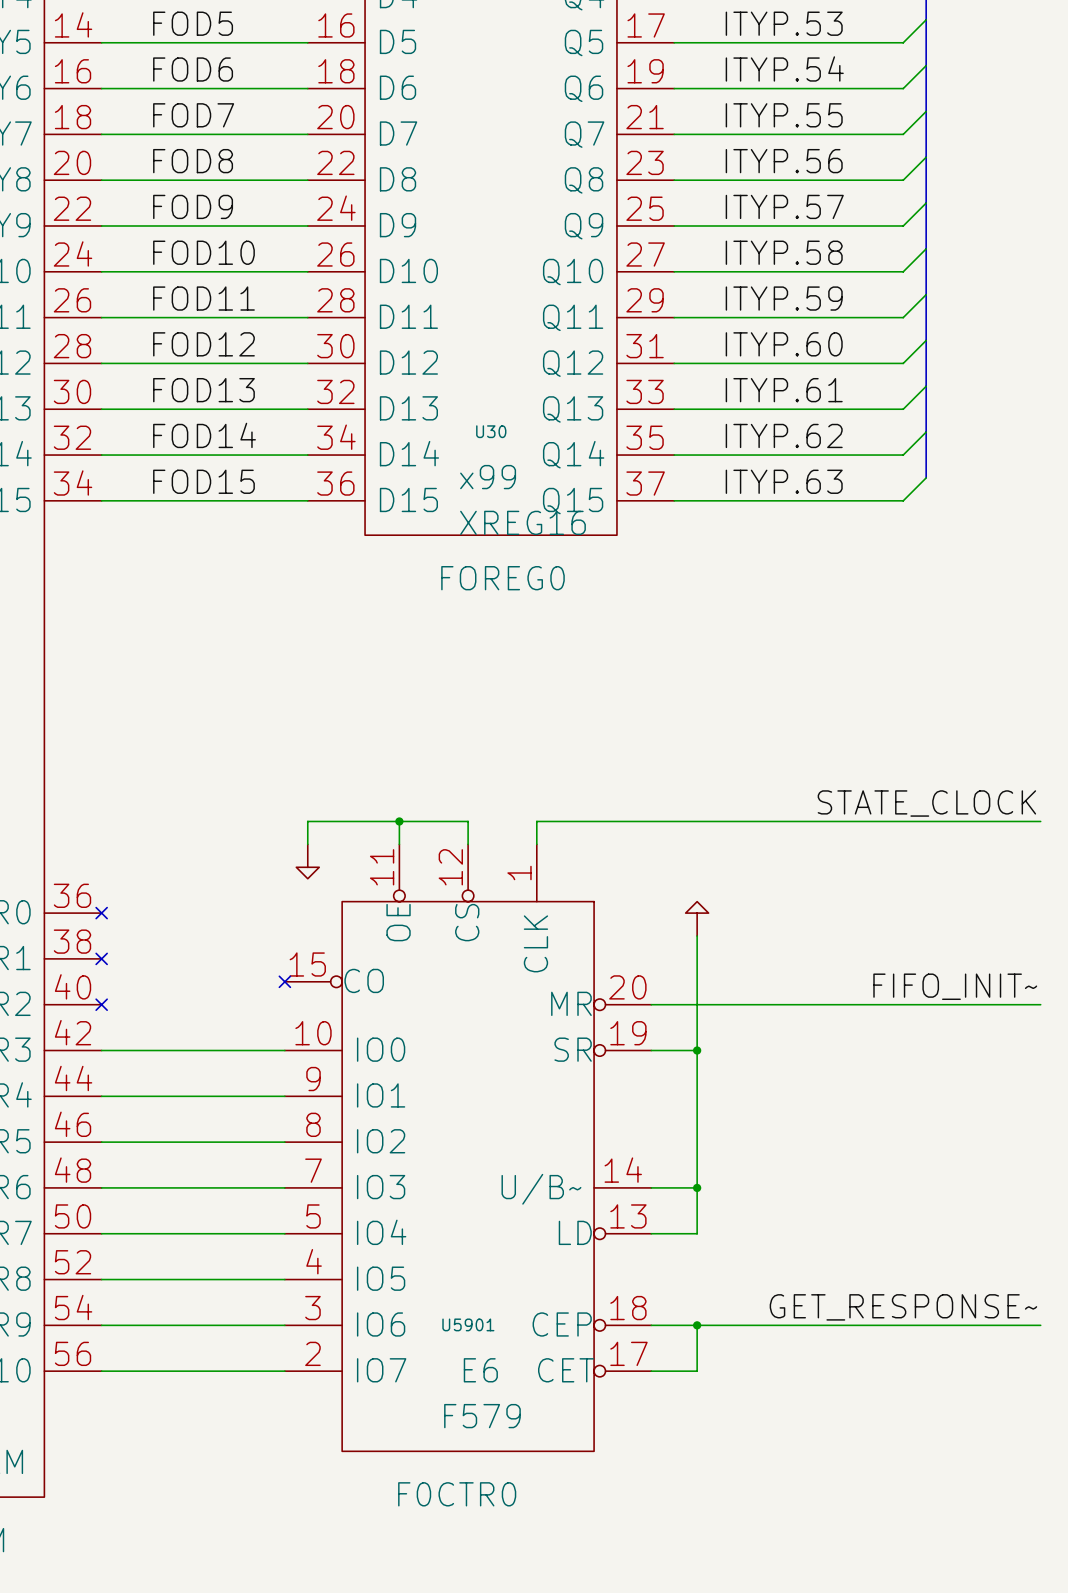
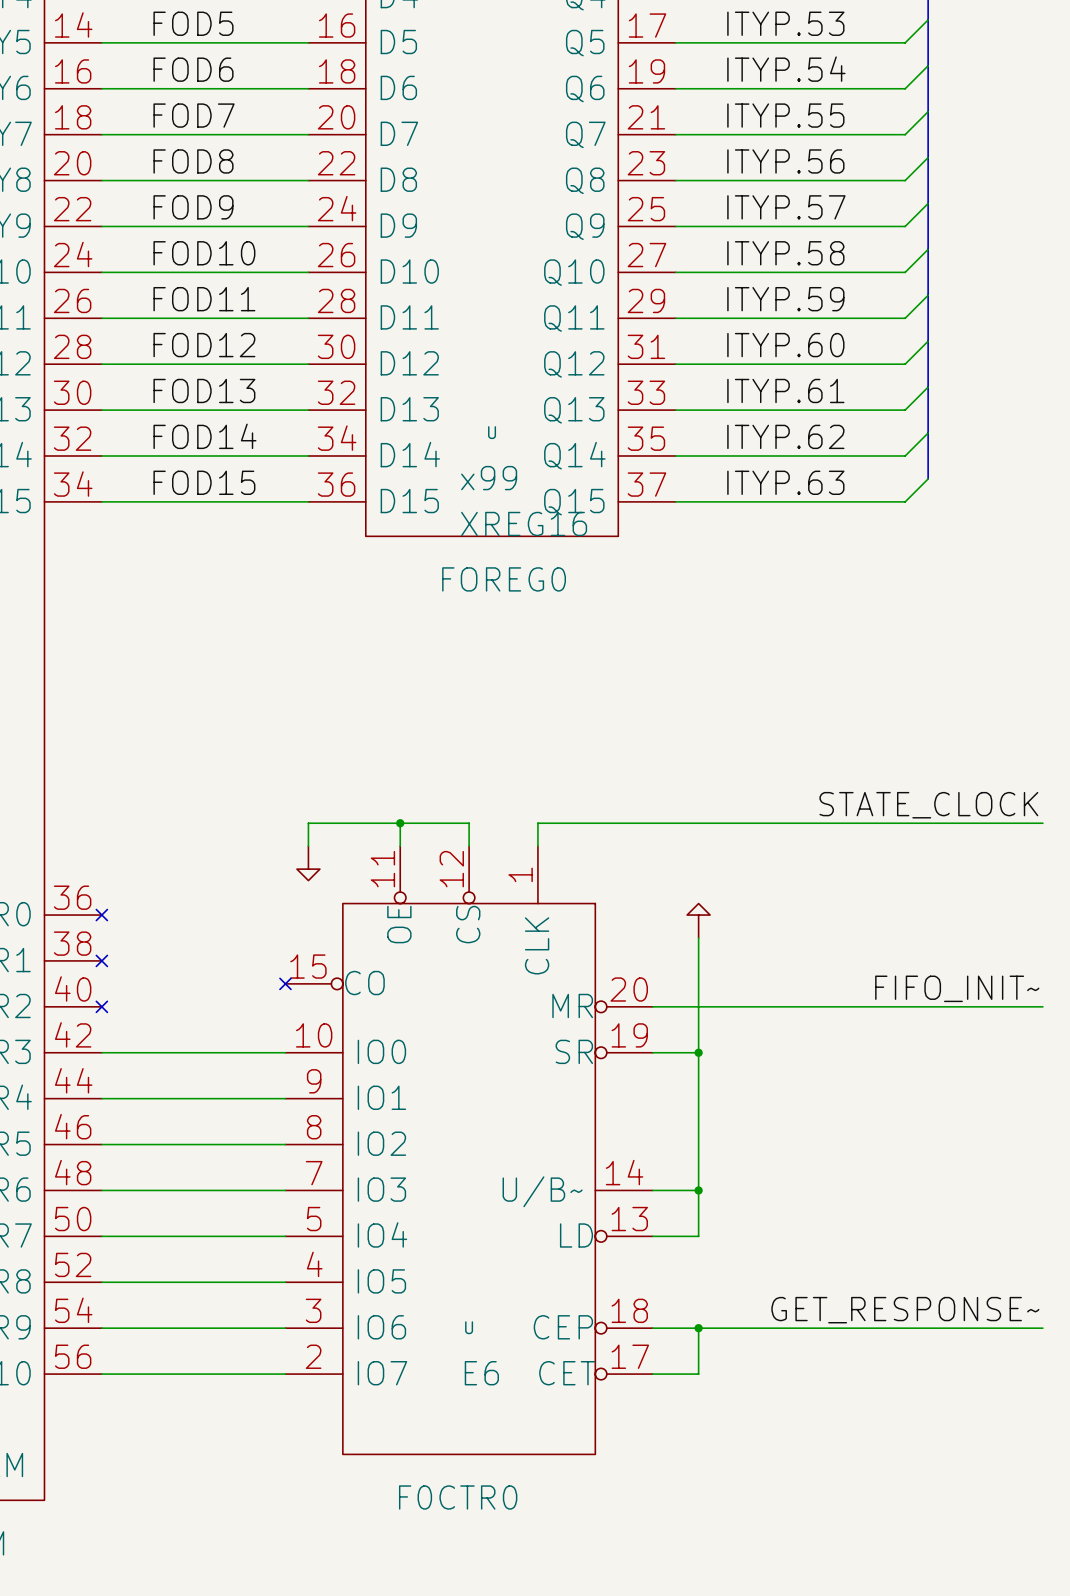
U30 name: U30 (491, 431) -> U (492, 432)
U5901 name: U5901 (468, 1324) -> U (469, 1327)
U5901 value: F579 (482, 1416) -> none

